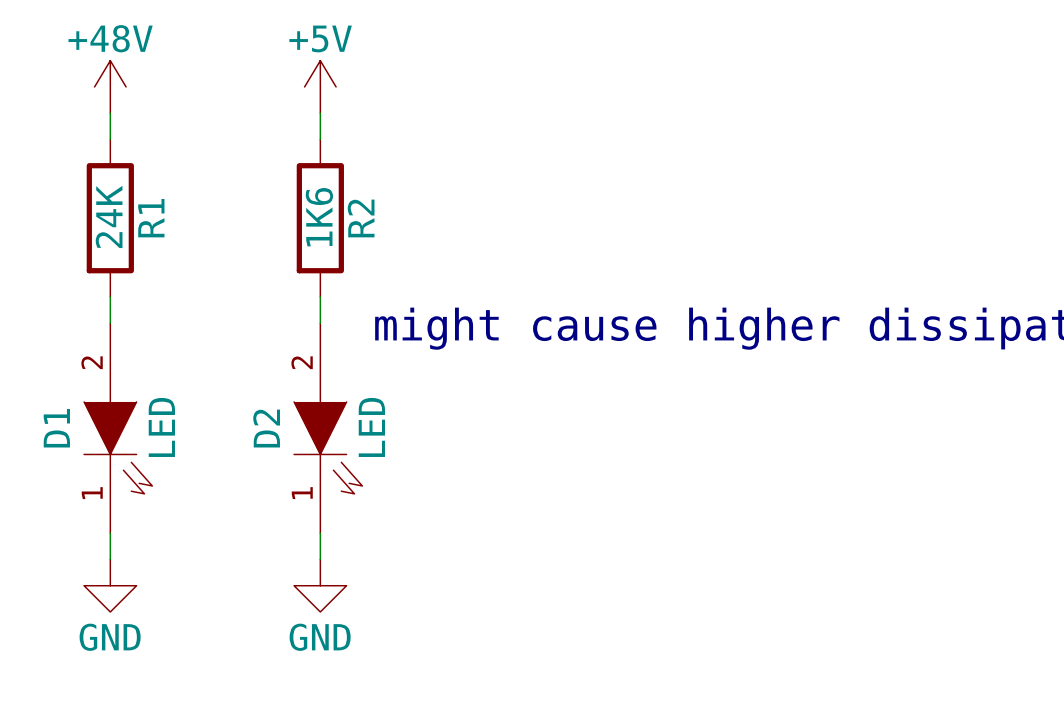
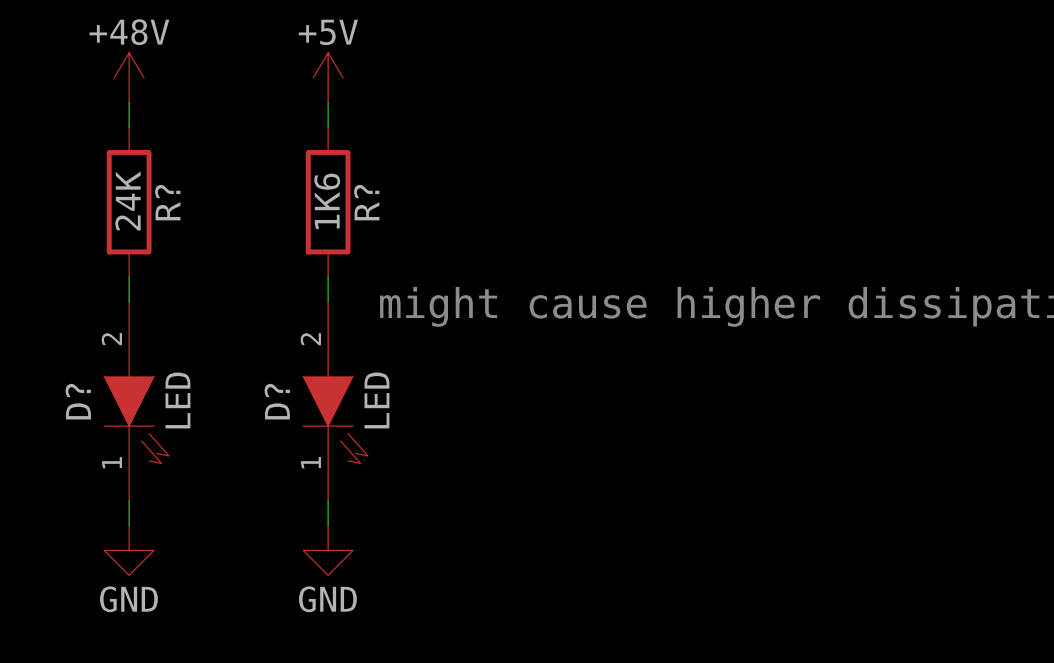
R1 name: R1 (151, 218) -> R? (167, 202)
R2 name: R2 (361, 218) -> R? (366, 202)
D1 name: D1 (56, 428) -> D? (78, 401)
D2 name: D2 (266, 428) -> D? (277, 401)

